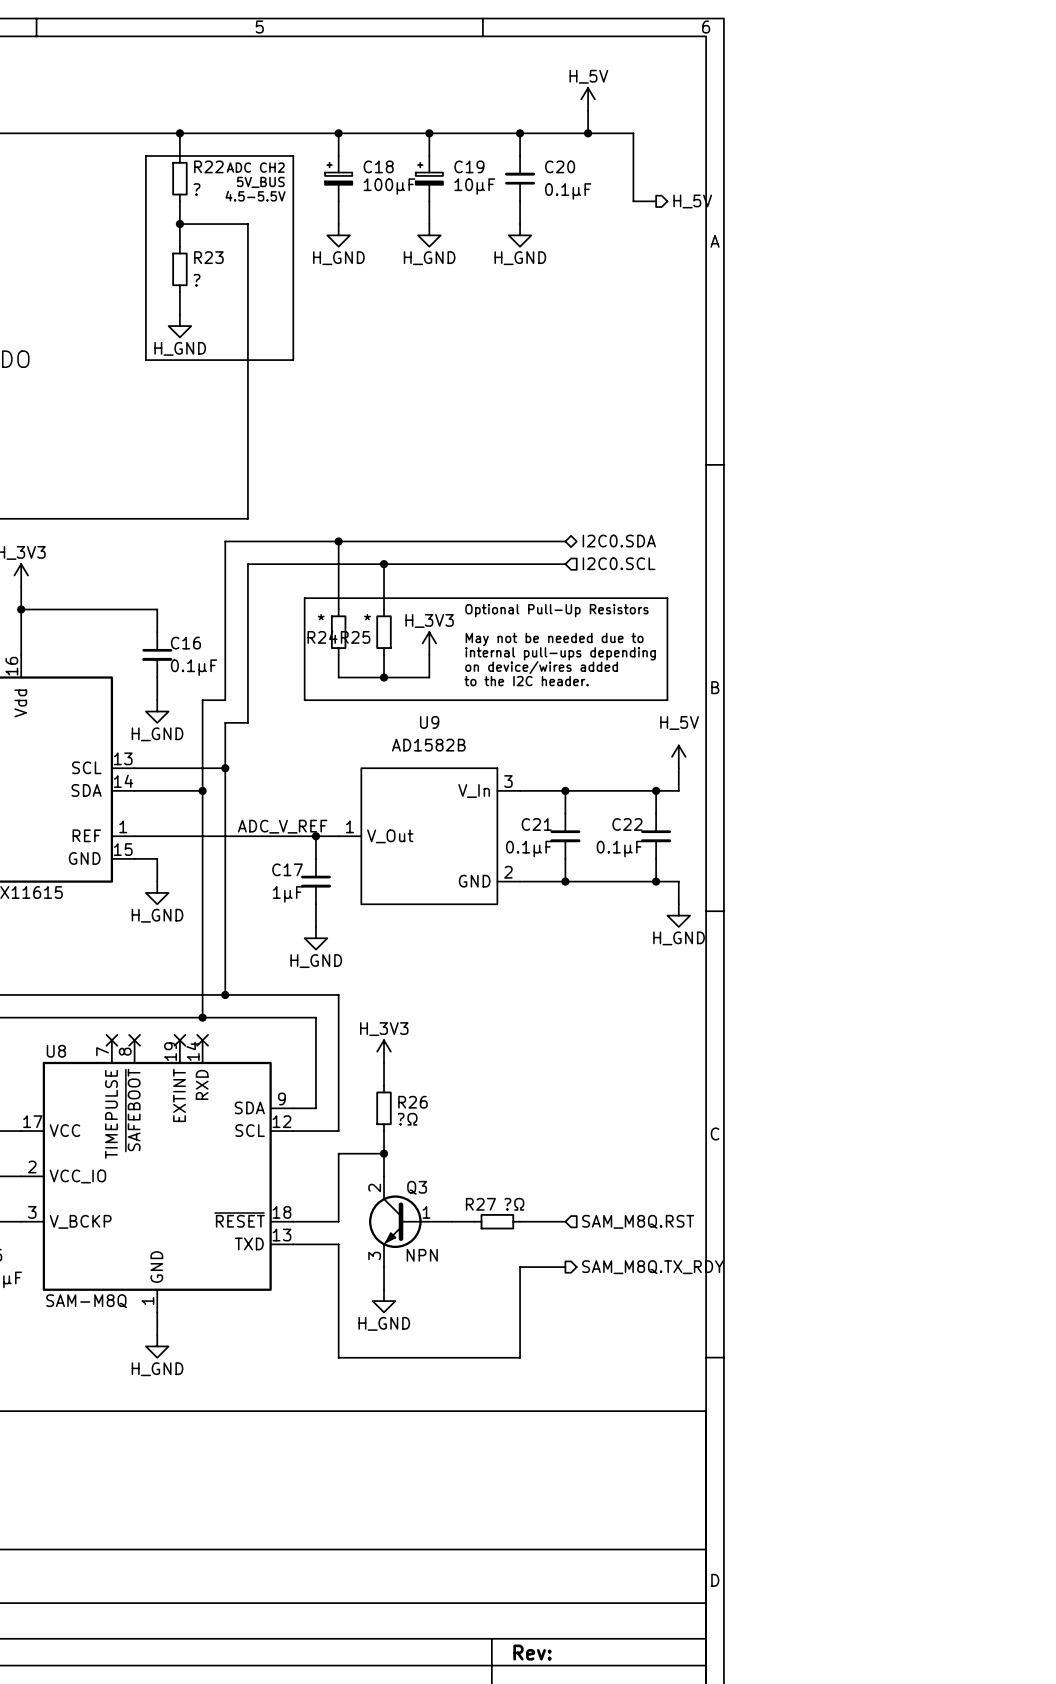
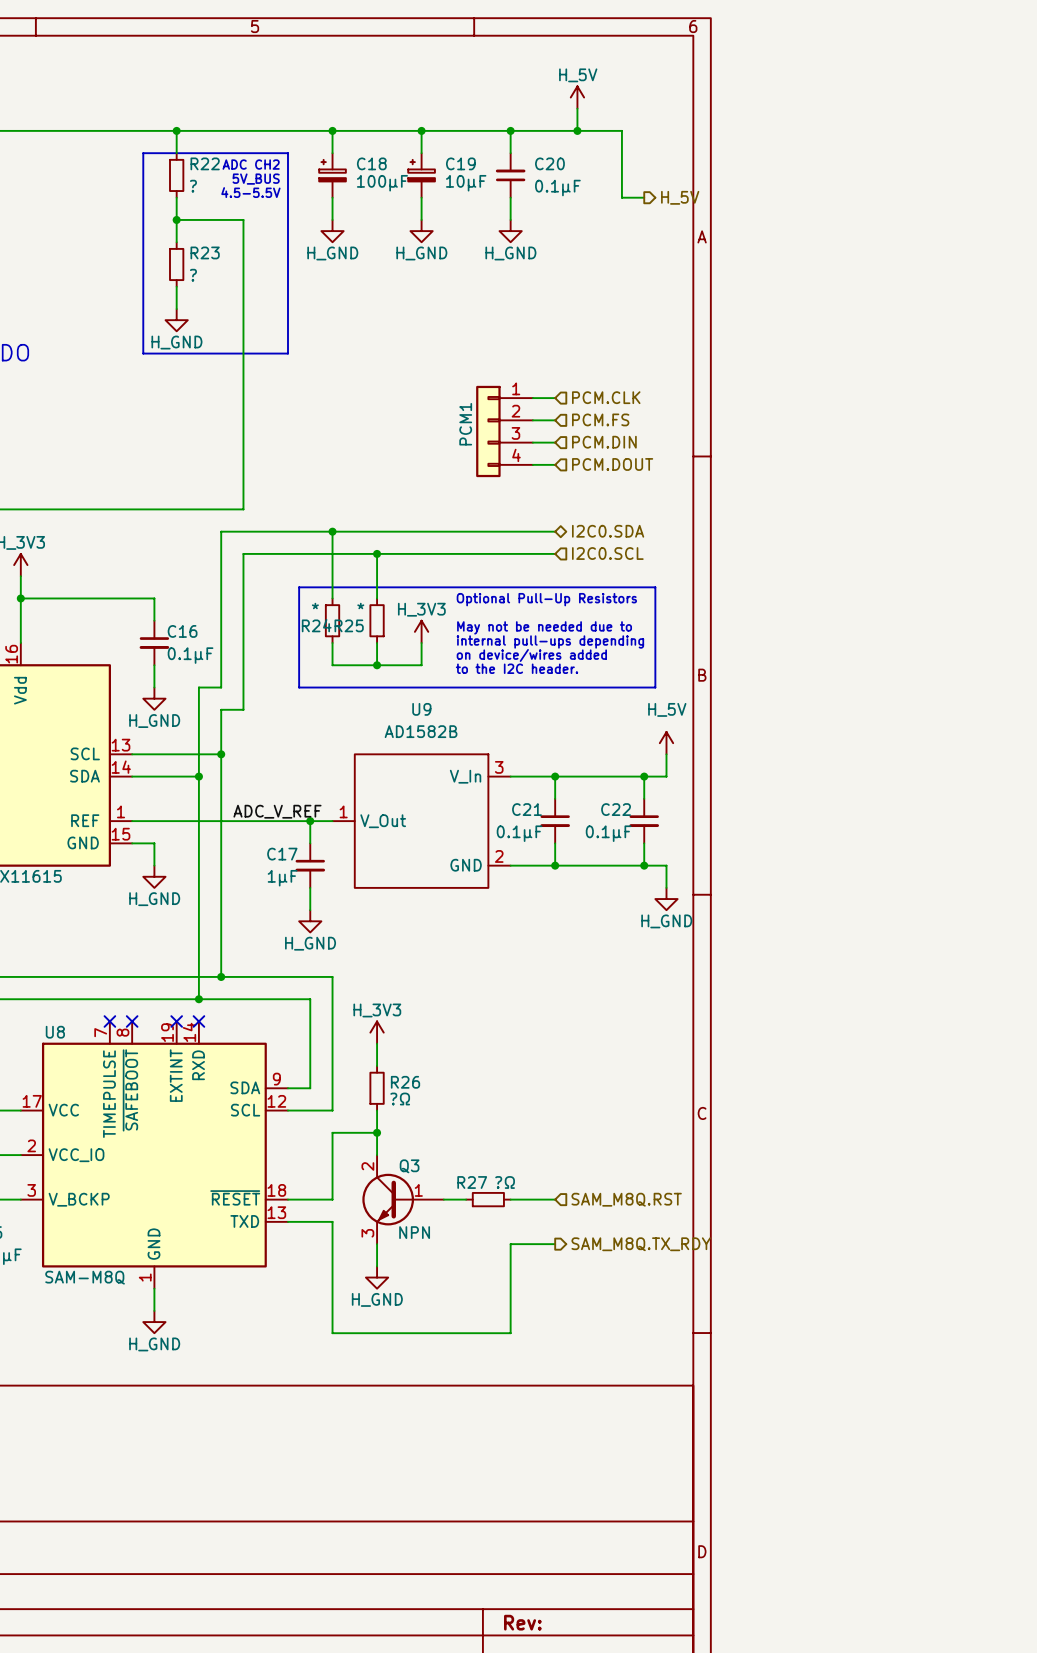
wire: none -> (532, 398) (555, 398)
hierarchical label: none -> PCM.CLK (606, 397)
hierarchical label: none -> PCM.FS (600, 419)
wire: none -> (532, 420) (555, 420)
PCM1: none -> (504, 431)
wire: none -> (532, 442) (555, 442)
hierarchical label: none -> PCM.DIN (604, 442)
wire: none -> (532, 464) (555, 464)
hierarchical label: none -> PCM.DOUT (612, 464)

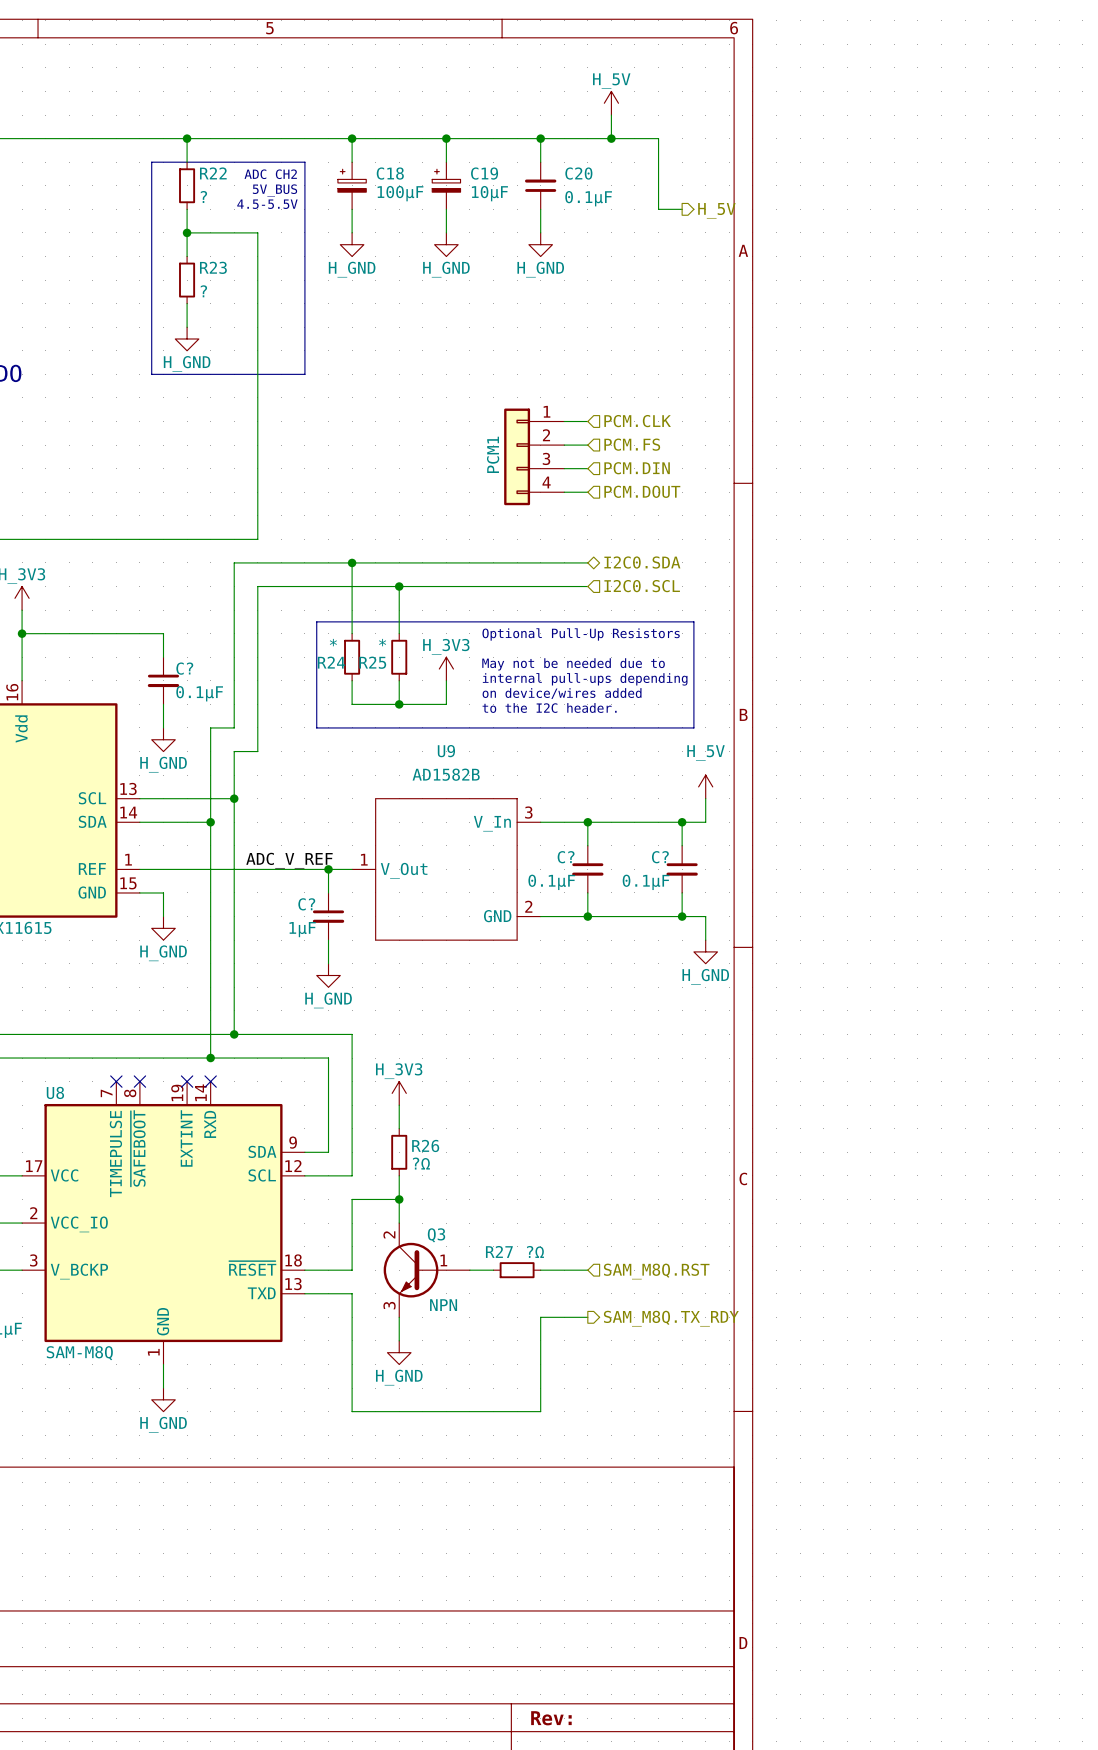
C16 name: C16 (182, 631) -> C? (184, 668)
C21 name: C21 (526, 809) -> C? (566, 857)
C22 name: C22 (616, 809) -> C? (660, 857)
C17 name: C17 (282, 854) -> C? (306, 904)

